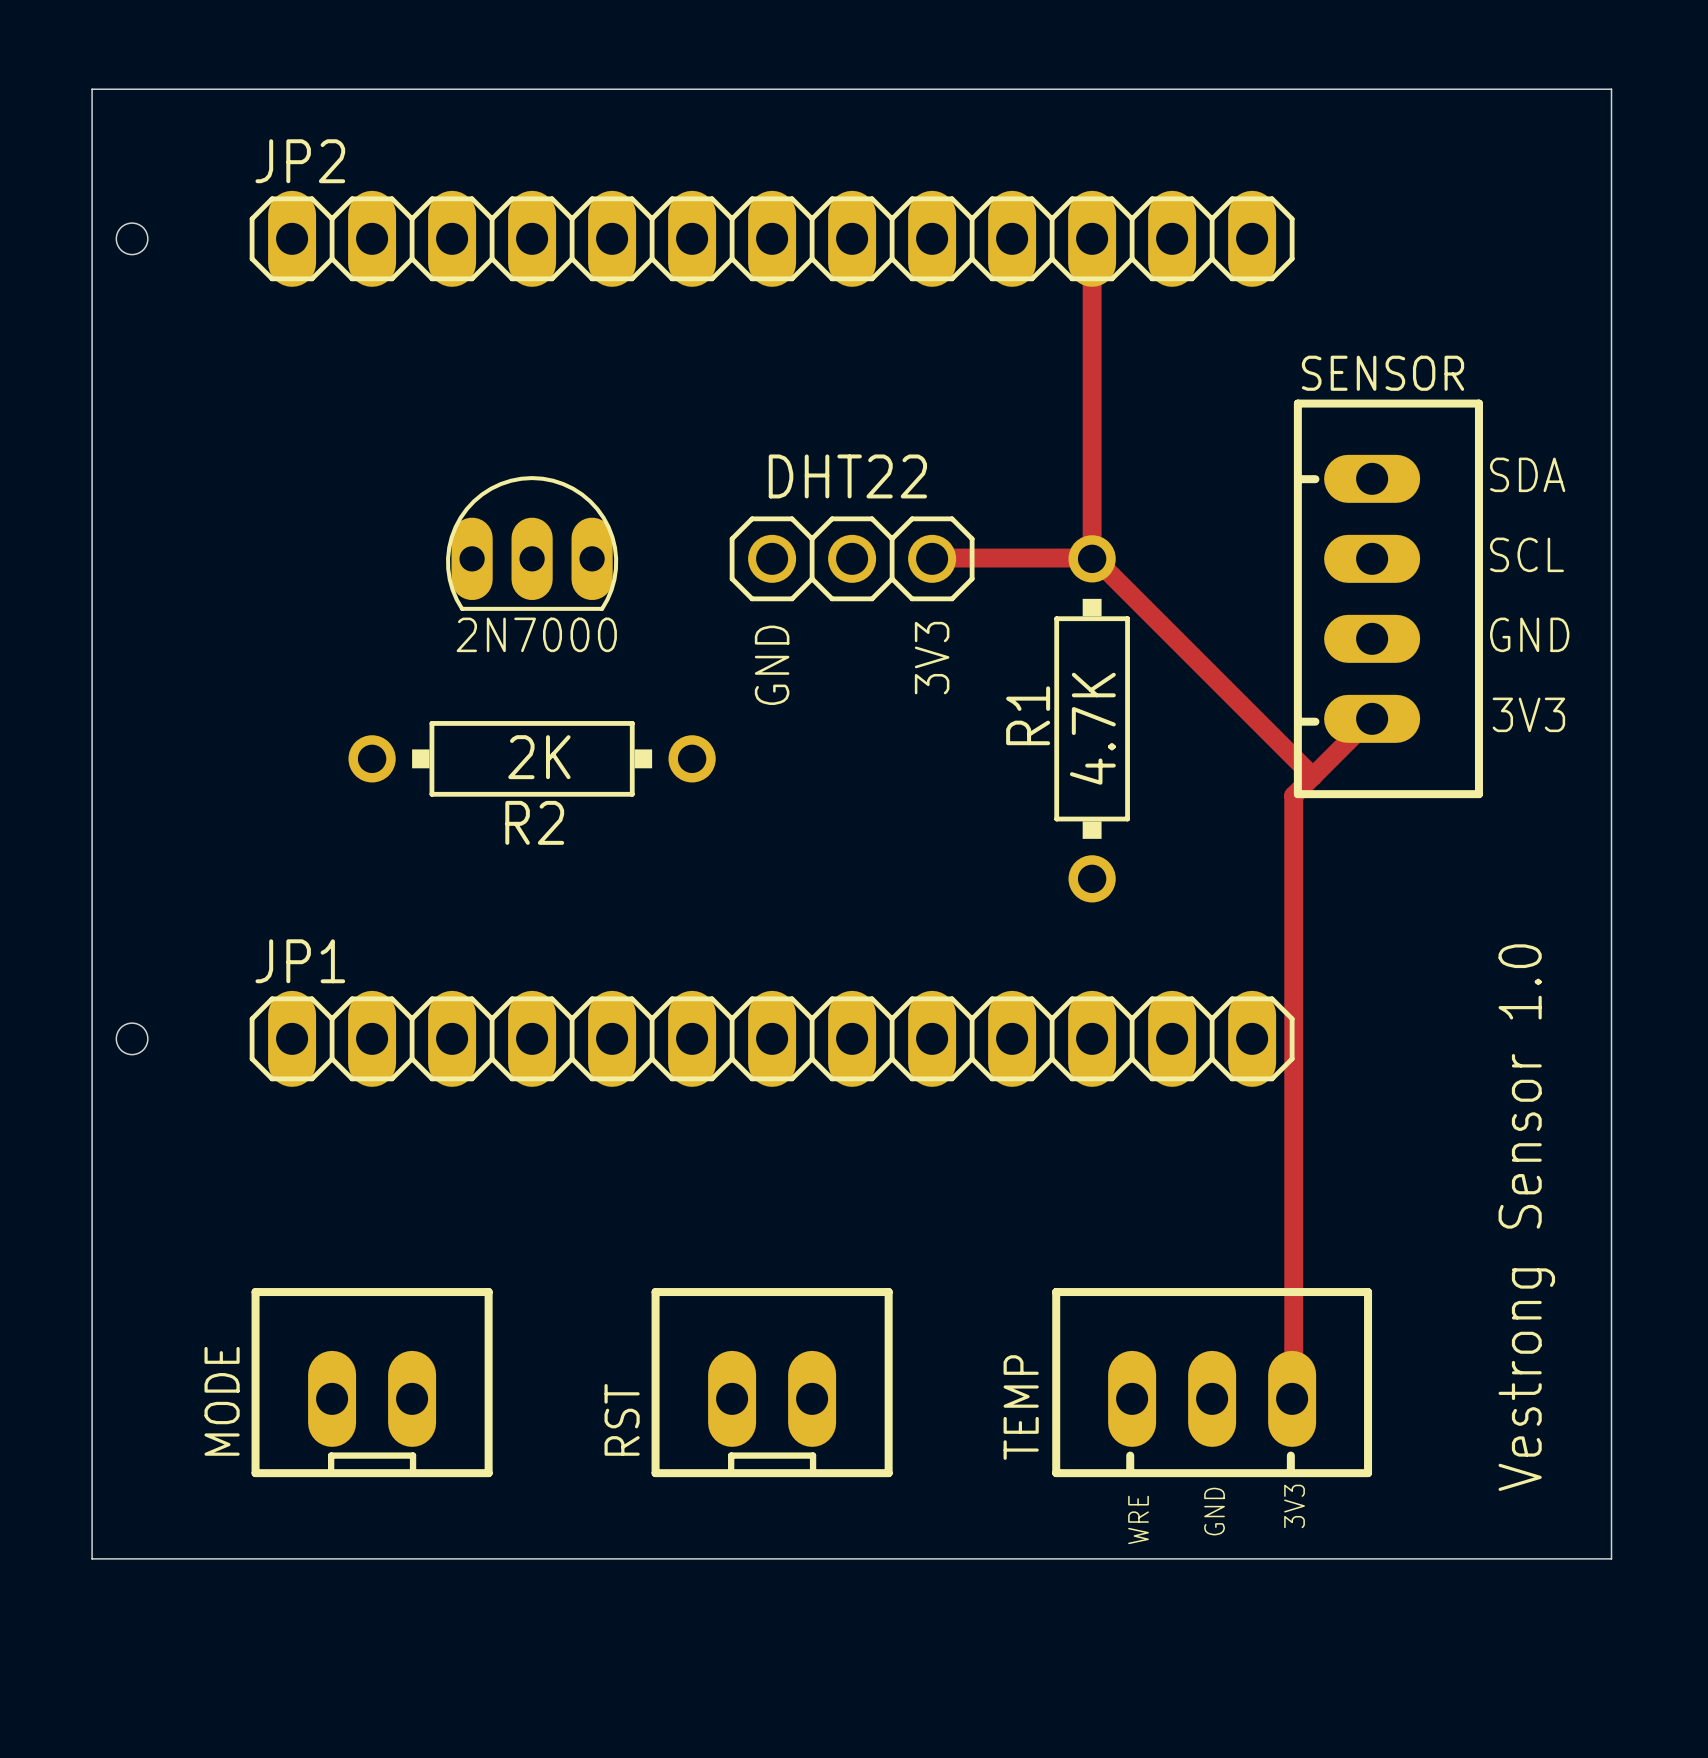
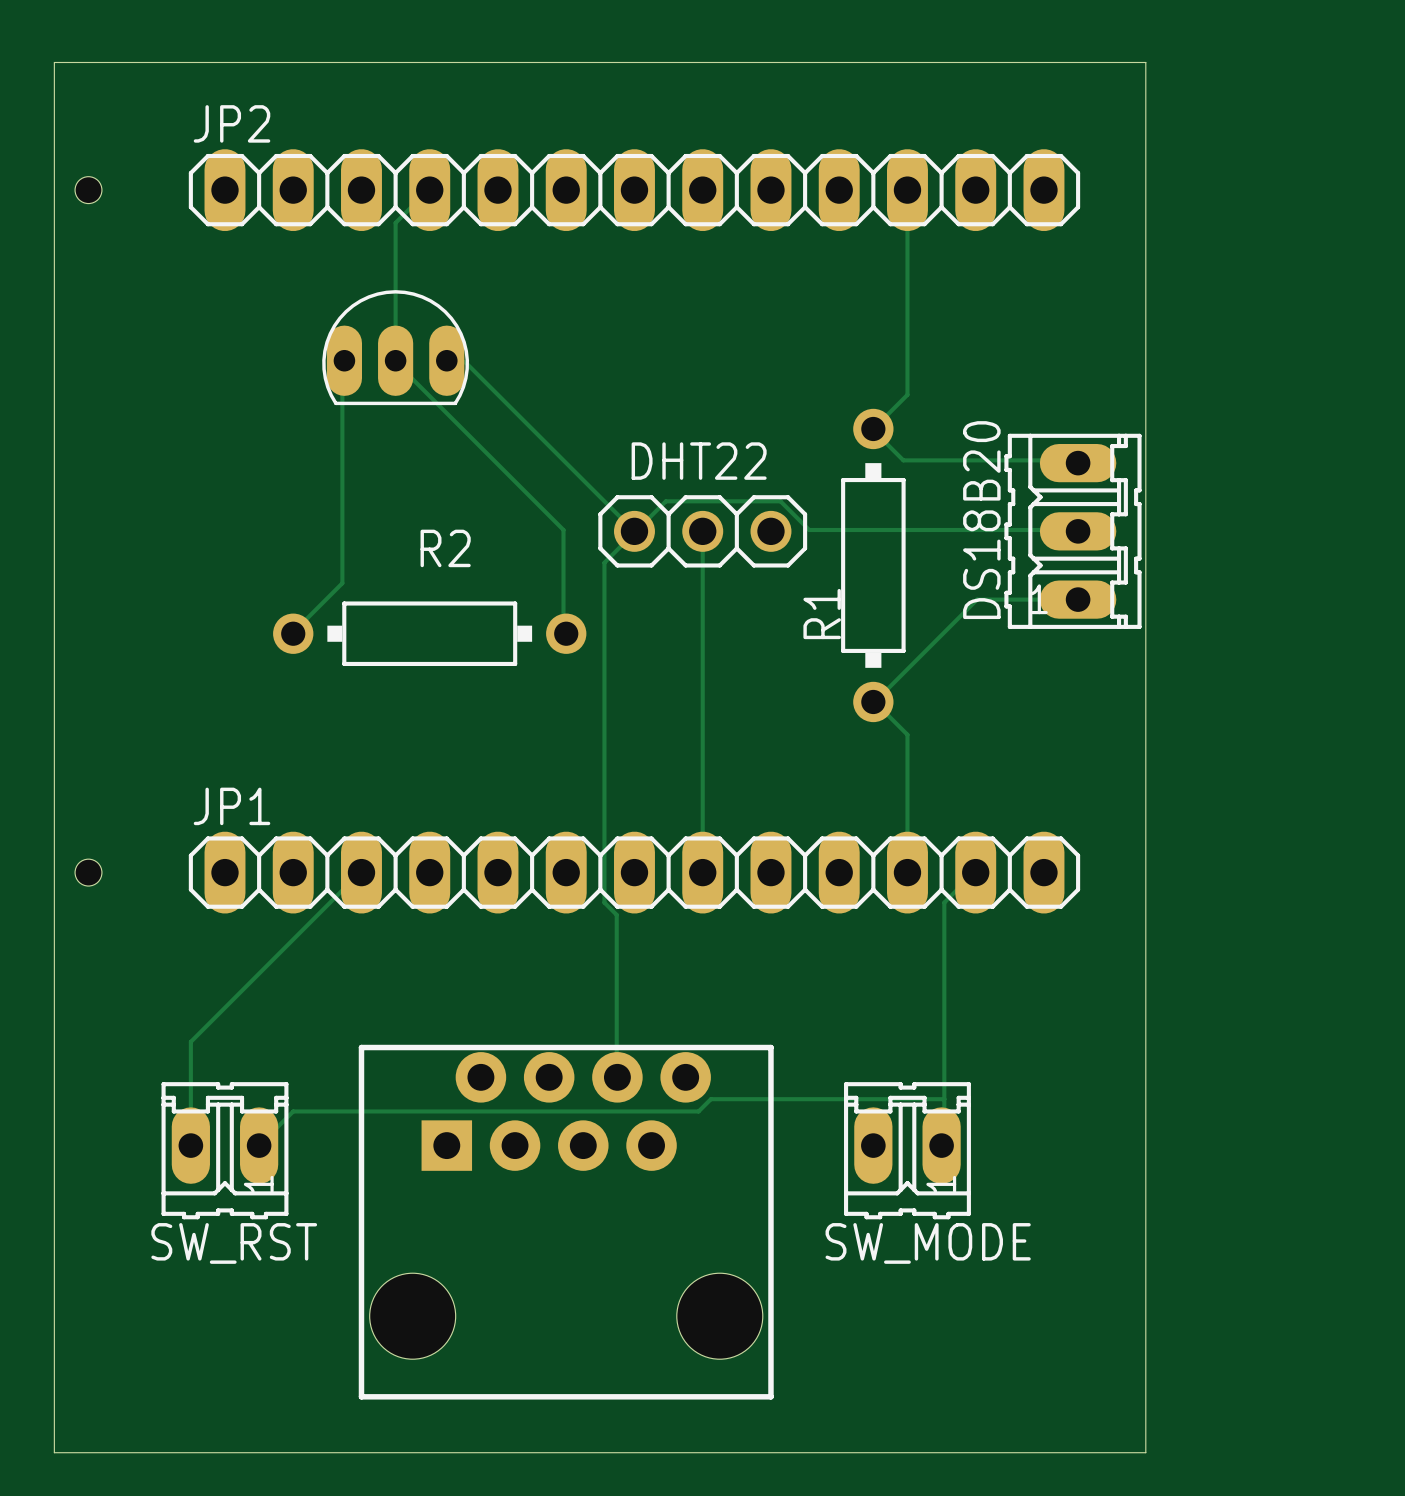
board edge: (1371, 89) (1611, 89) (1611, 1558) (92, 1558) -> (1145, 62) (1145, 1452) (54, 1452) (54, 1316)
track: none -> (429, 190) (395, 222) (395, 362) (563, 529) (563, 632) (566, 633)
track width: thick (1092, 238) (1092, 478) -> thin (907, 190) (907, 394)
part: none -> (395, 347)
track: none -> (344, 360) (342, 362) (342, 583) (293, 633)
track: none -> (446, 360) (465, 362) (634, 531)
text: SDA (1527, 474) -> none
track: (1092, 478) (1092, 558) (1099, 562) (1312, 776) -> (907, 394) (873, 428) (903, 460) (1075, 460) (1078, 463)
part: 2N7000 (532, 543) -> none
text: SCL (1526, 554) -> none
DHT22 position: (852, 558) -> (702, 531)
track: (1092, 558) (932, 558) -> none
SENSOR: (1388, 598) -> none
text: GND (1529, 634) -> none
track: none -> (634, 531) (665, 501) (780, 501) (809, 529) (1078, 531)
track: none -> (634, 531) (604, 562) (604, 902) (616, 914) (617, 1077)
track: none -> (702, 531) (702, 872)
DS18B20: none -> (1072, 531)
text: 3V3 (932, 658) -> none
text: GND (772, 665) -> none
text: 3V3 (1528, 714) -> none
R1 name position: R1 (1028, 715) -> R1 (822, 614)
R1 position: (1092, 718) -> (873, 565)
track: none -> (1078, 599) (977, 599) (874, 701)
track: (1372, 718) (1293, 795) (1293, 1398) (1292, 1398) -> none
R1 value: 4.7K (1092, 728) -> none
R2 value: 2K (539, 757) -> none
R2 name position: R2 (534, 822) -> R2 (445, 548)
track: none -> (874, 701) (907, 734) (907, 872)
track: none -> (361, 872) (190, 1041) (190, 1145)
track: none -> (975, 872) (944, 902) (944, 1144) (941, 1145)
text: Vestrong Sensor 1.0 (1526, 1217) -> none
track: none -> (944, 1099) (710, 1099) (698, 1111) (293, 1111) (259, 1145)
SW_RST: none -> (224, 1150)
SW_MODE: none -> (907, 1150)
MODE: (372, 1382) -> none
RST: (772, 1382) -> none
TEMP: (1212, 1382) -> none
part: none -> (566, 1222)
text: 3V3 (1294, 1506) -> none
text: GND (1214, 1511) -> none
text: WRE (1138, 1519) -> none

